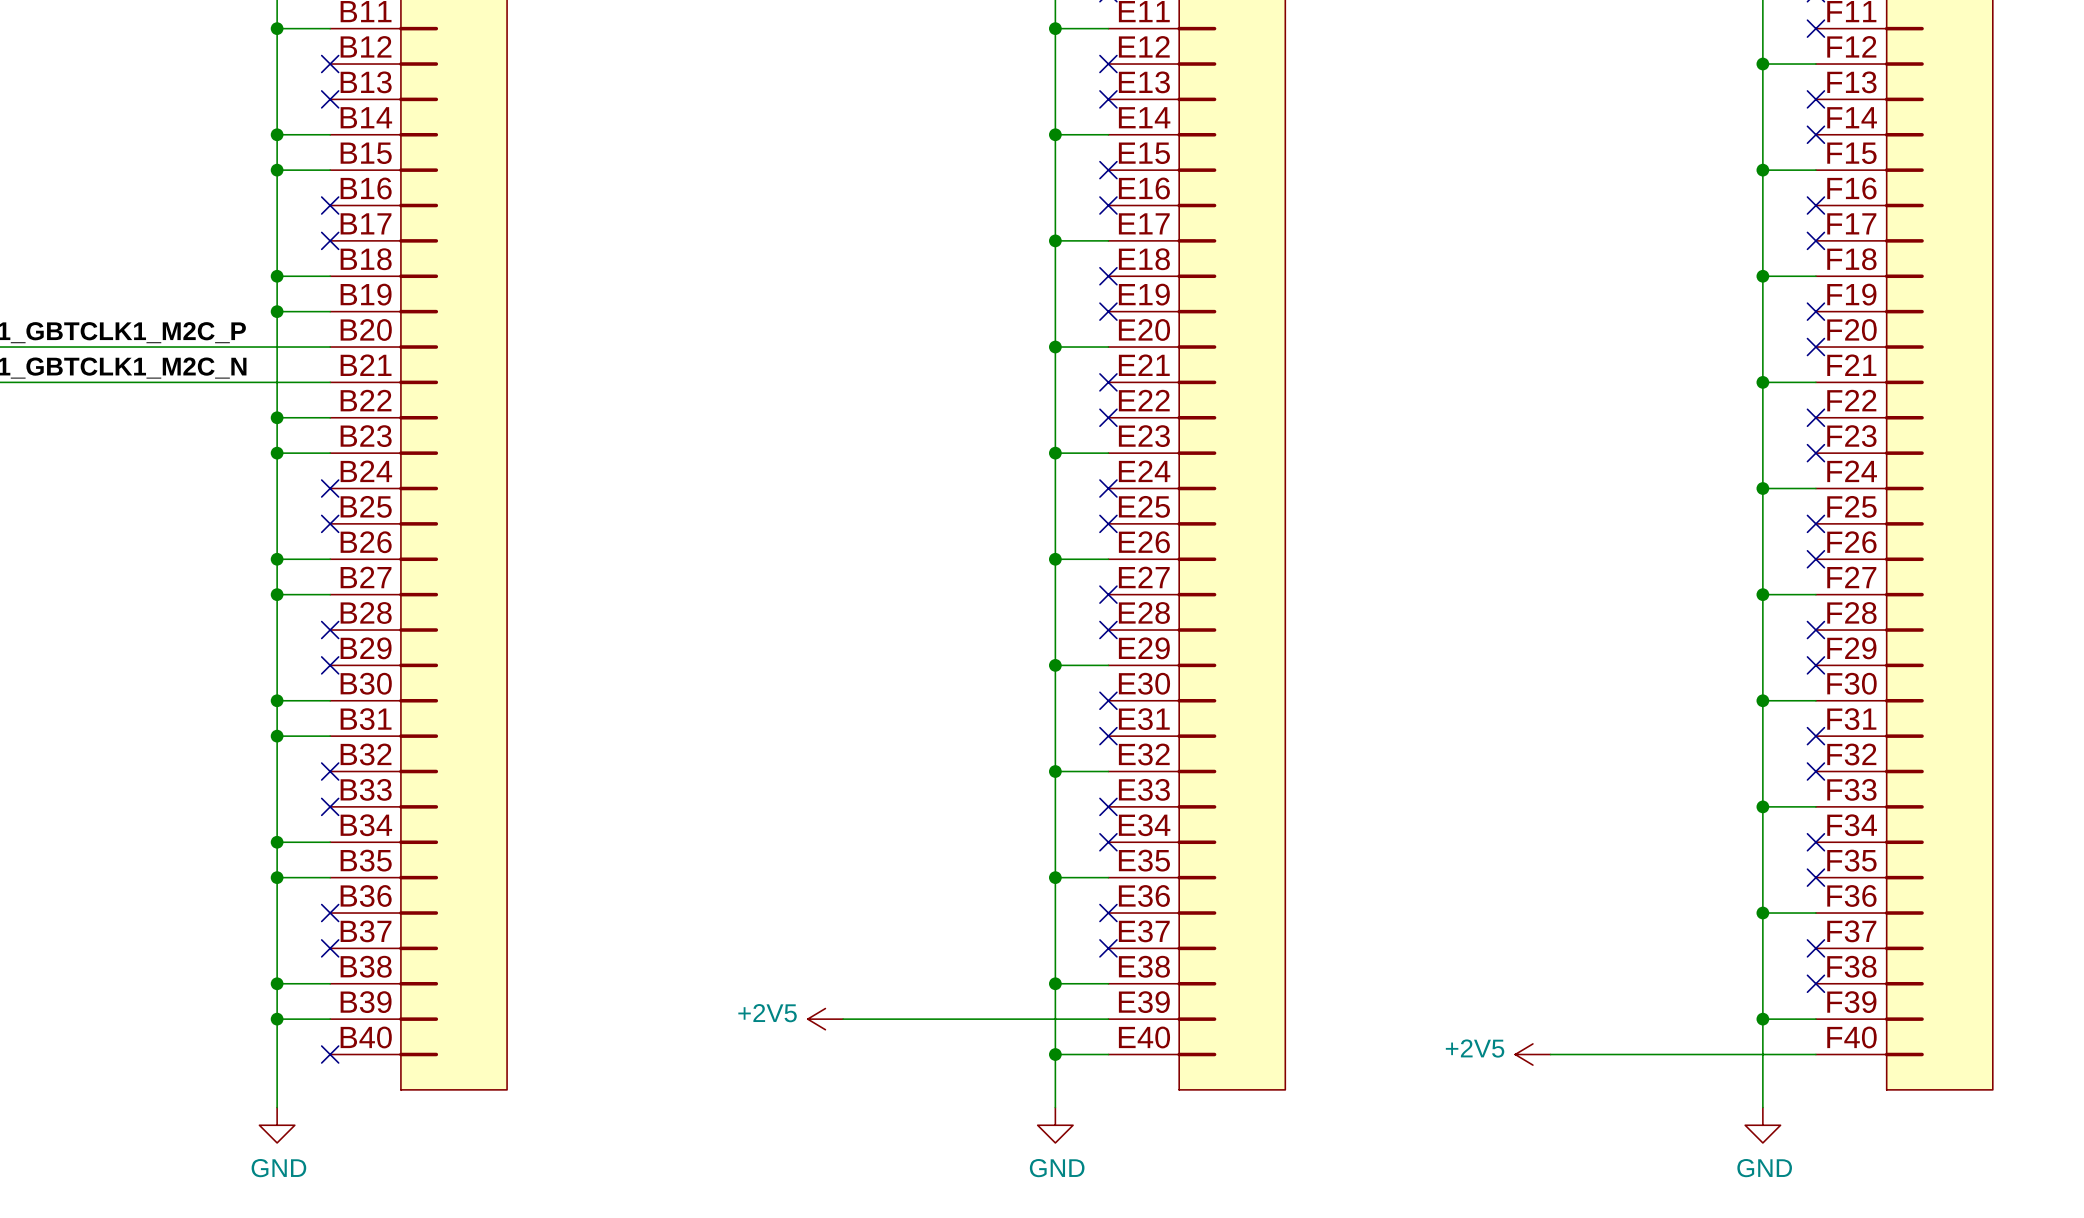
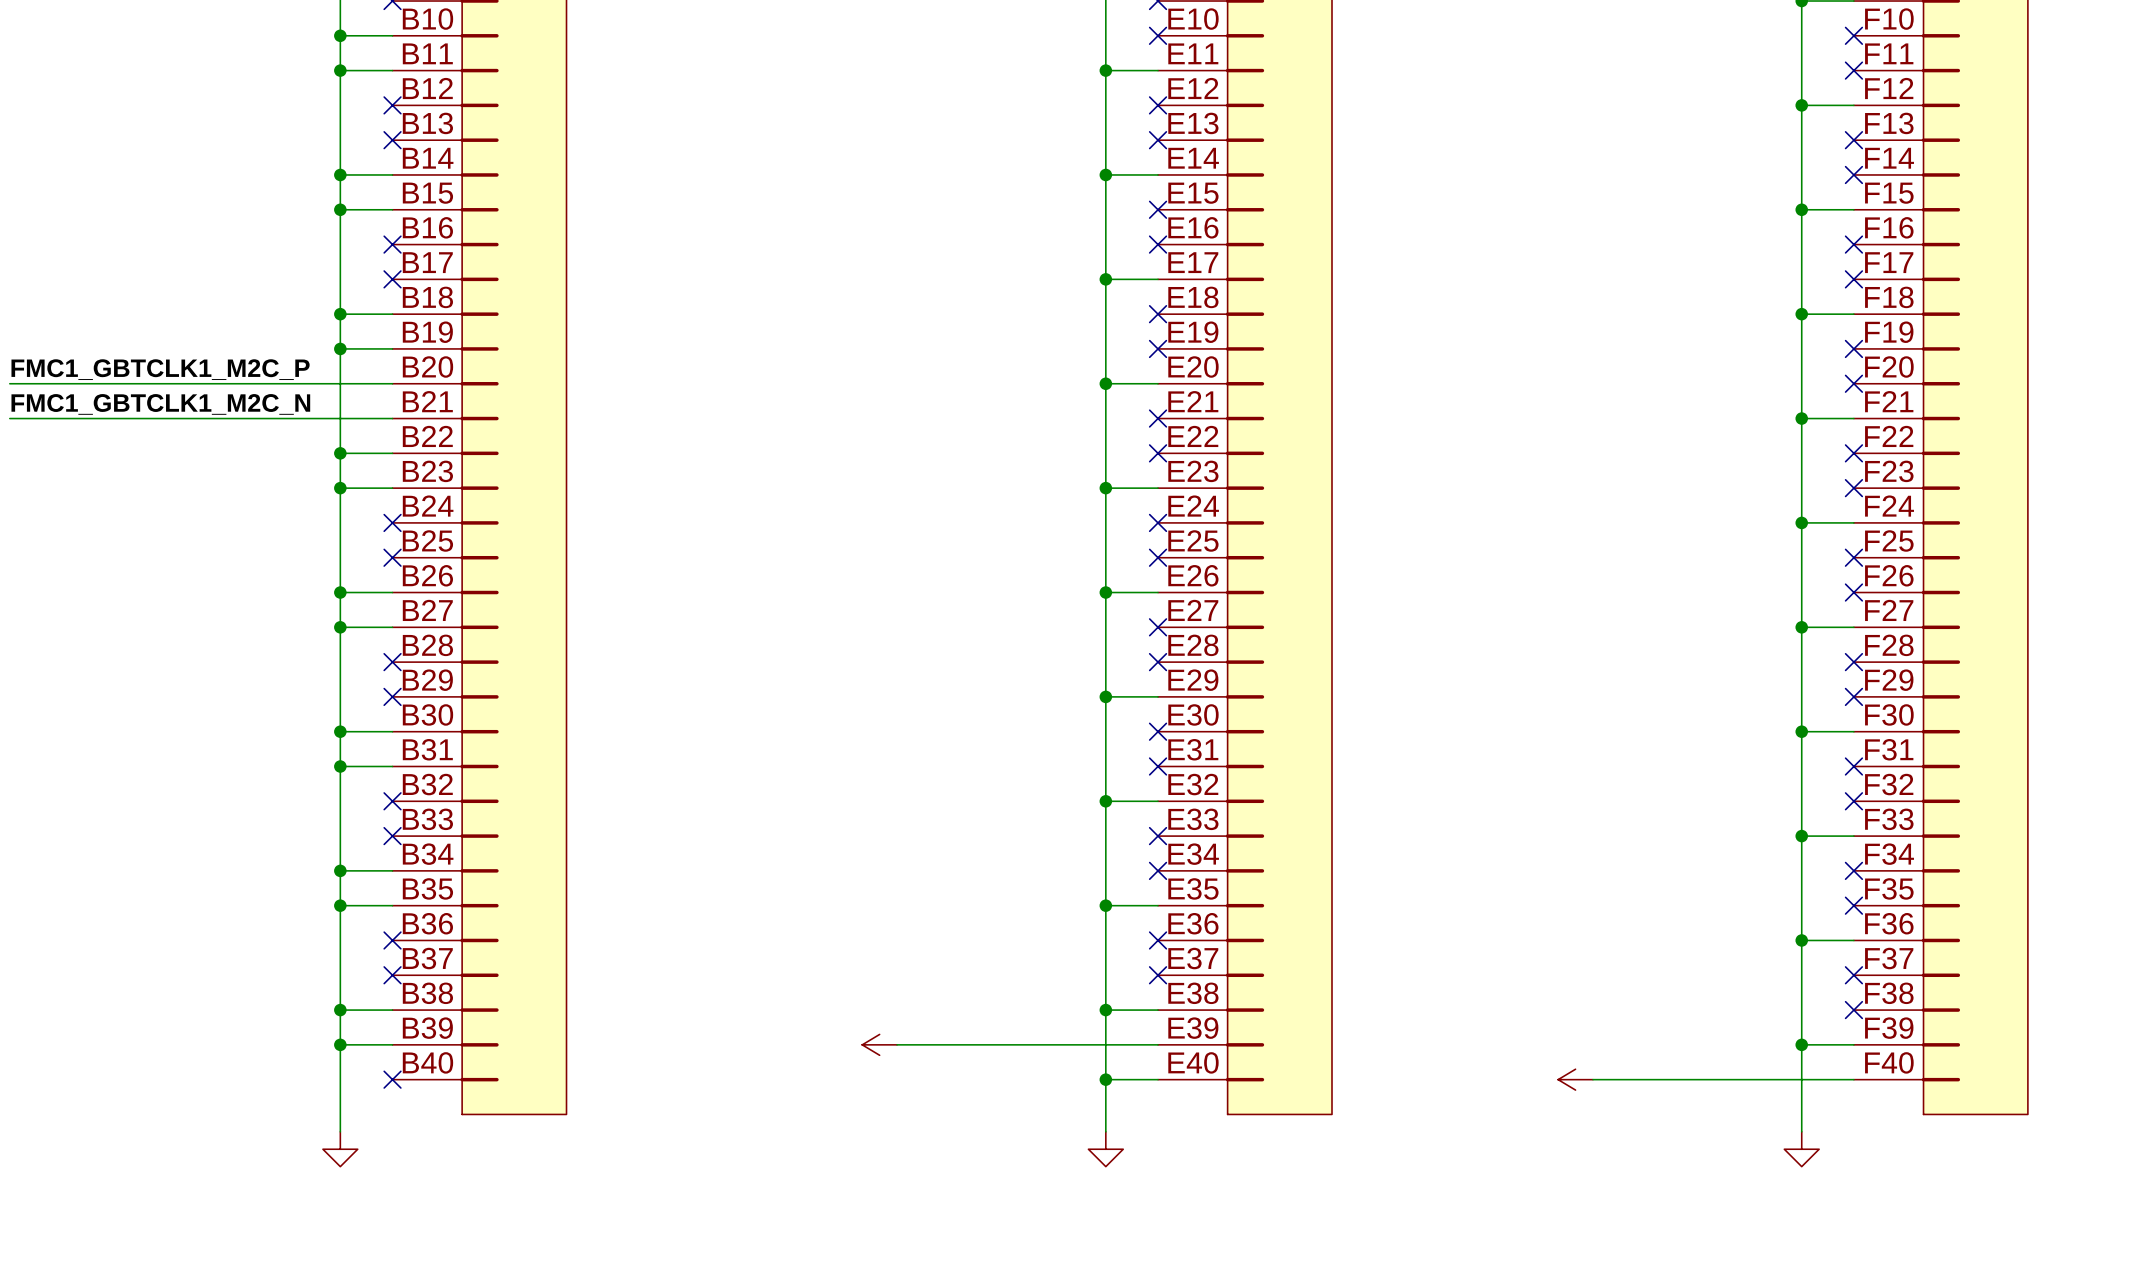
power symbol text: +2V5 (767, 1013) -> none
power symbol text: +2V5 (1475, 1048) -> none
power symbol text: GND (278, 1168) -> none
power symbol text: GND (1057, 1168) -> none
power symbol text: GND (1764, 1168) -> none

